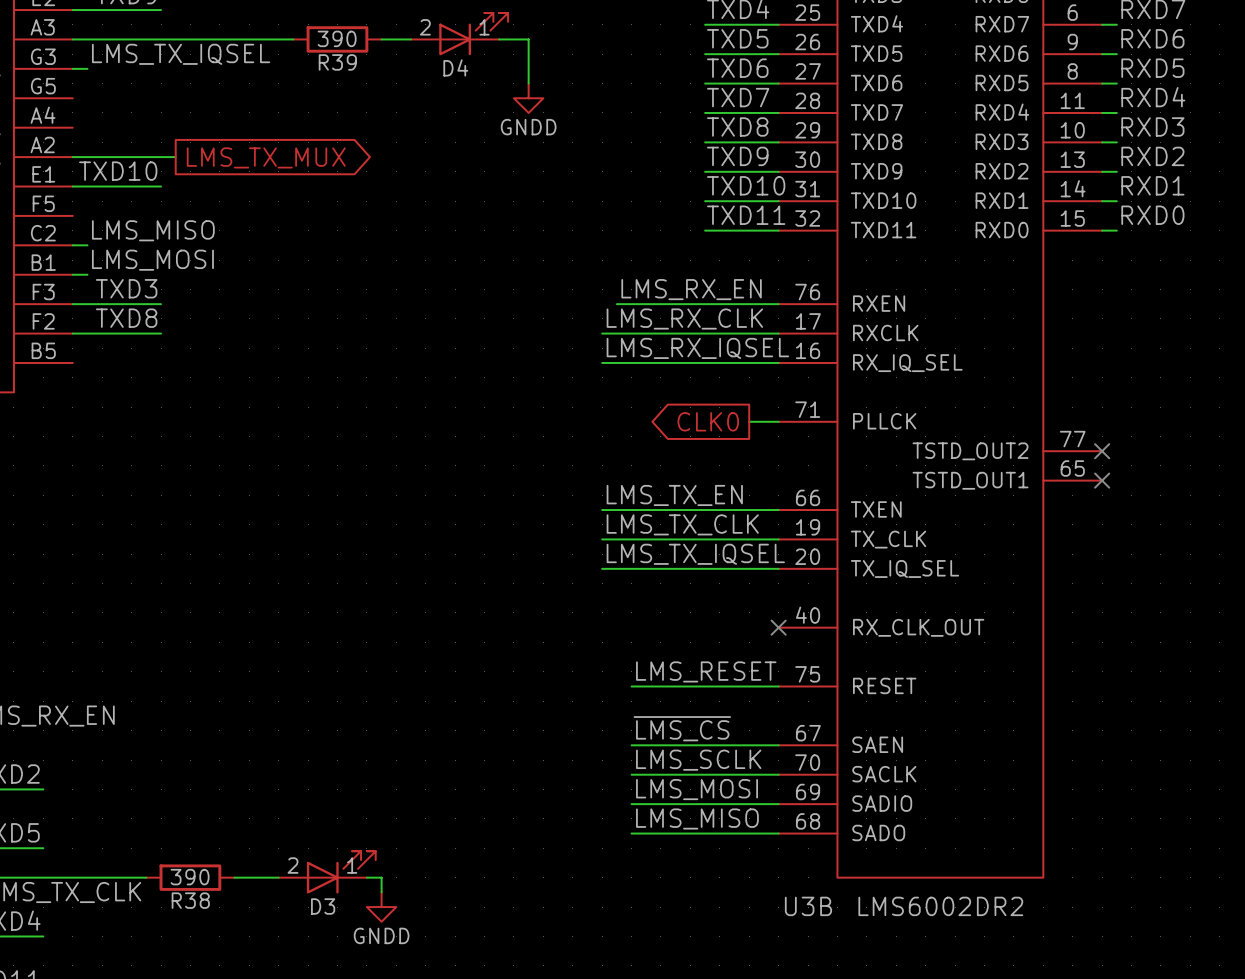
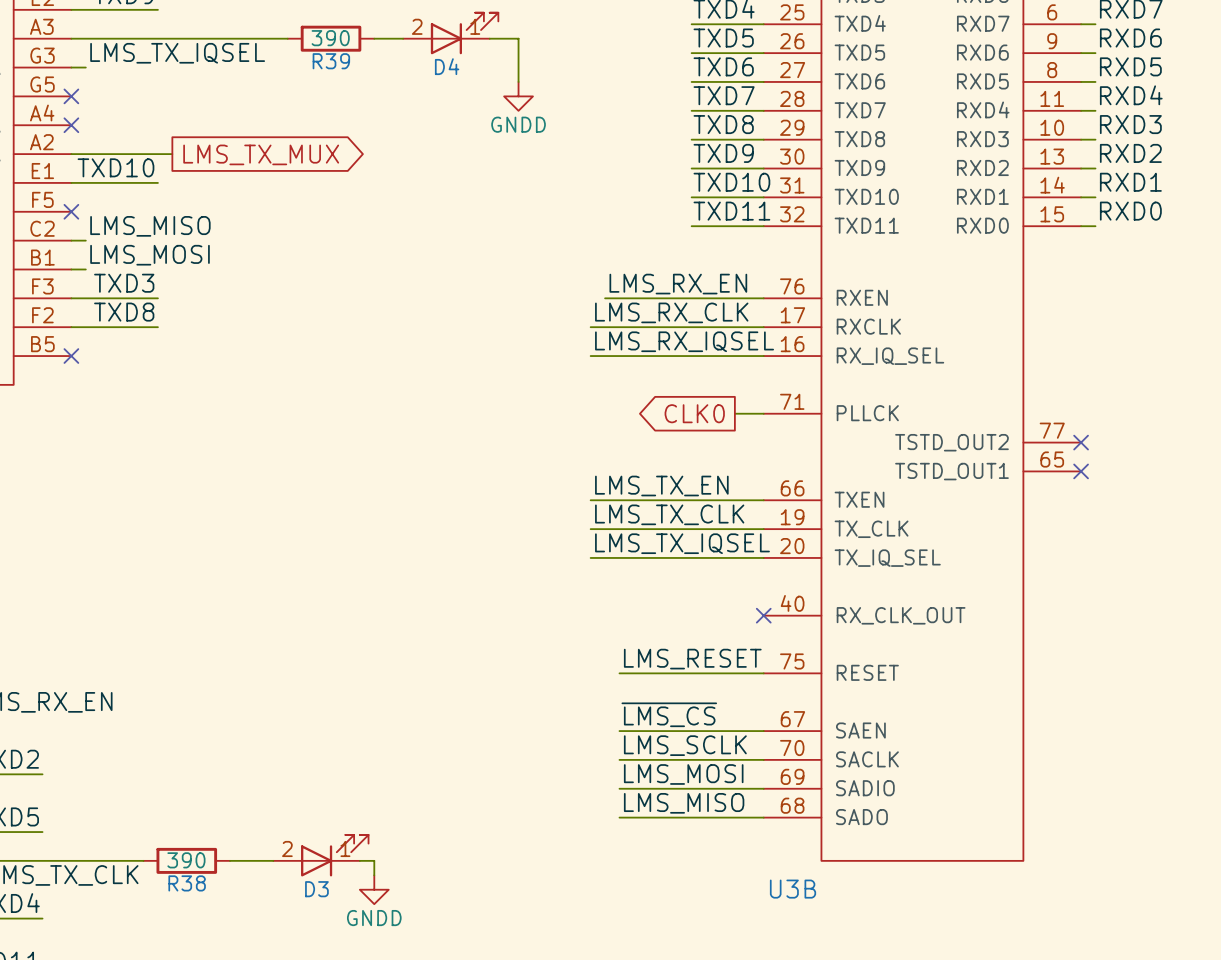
no-connect mark: none -> (71, 96)
no-connect mark: none -> (71, 125)
no-connect mark: none -> (71, 211)
no-connect mark: none -> (71, 356)
U3B text: LMS6002DR2 (940, 906) -> none

